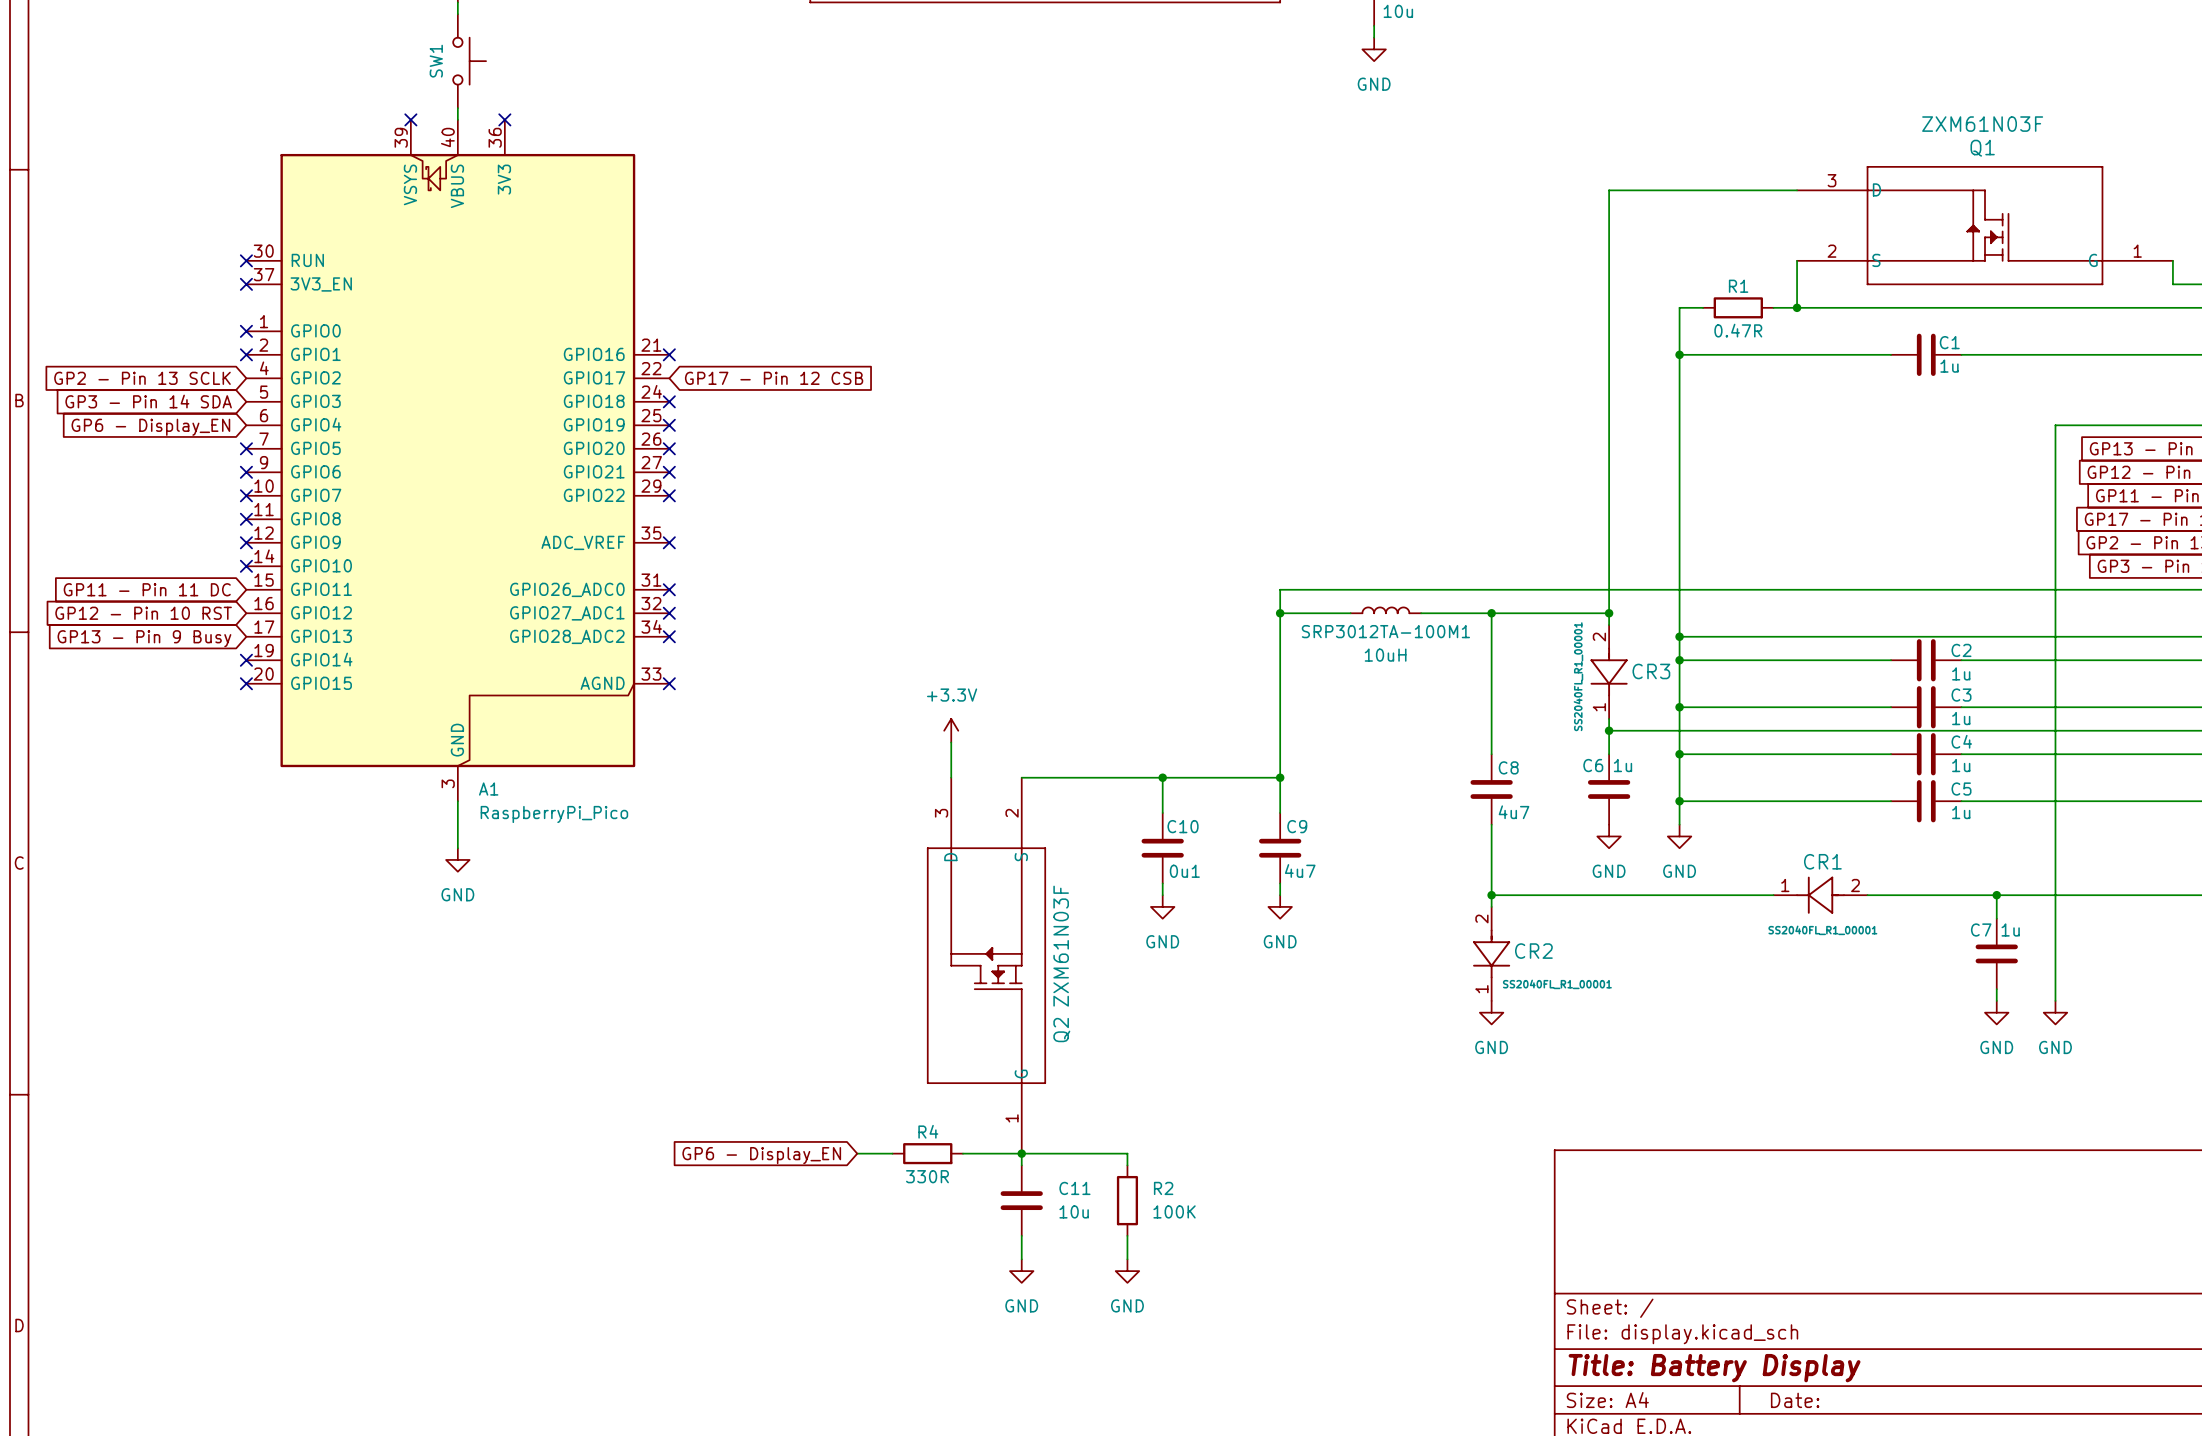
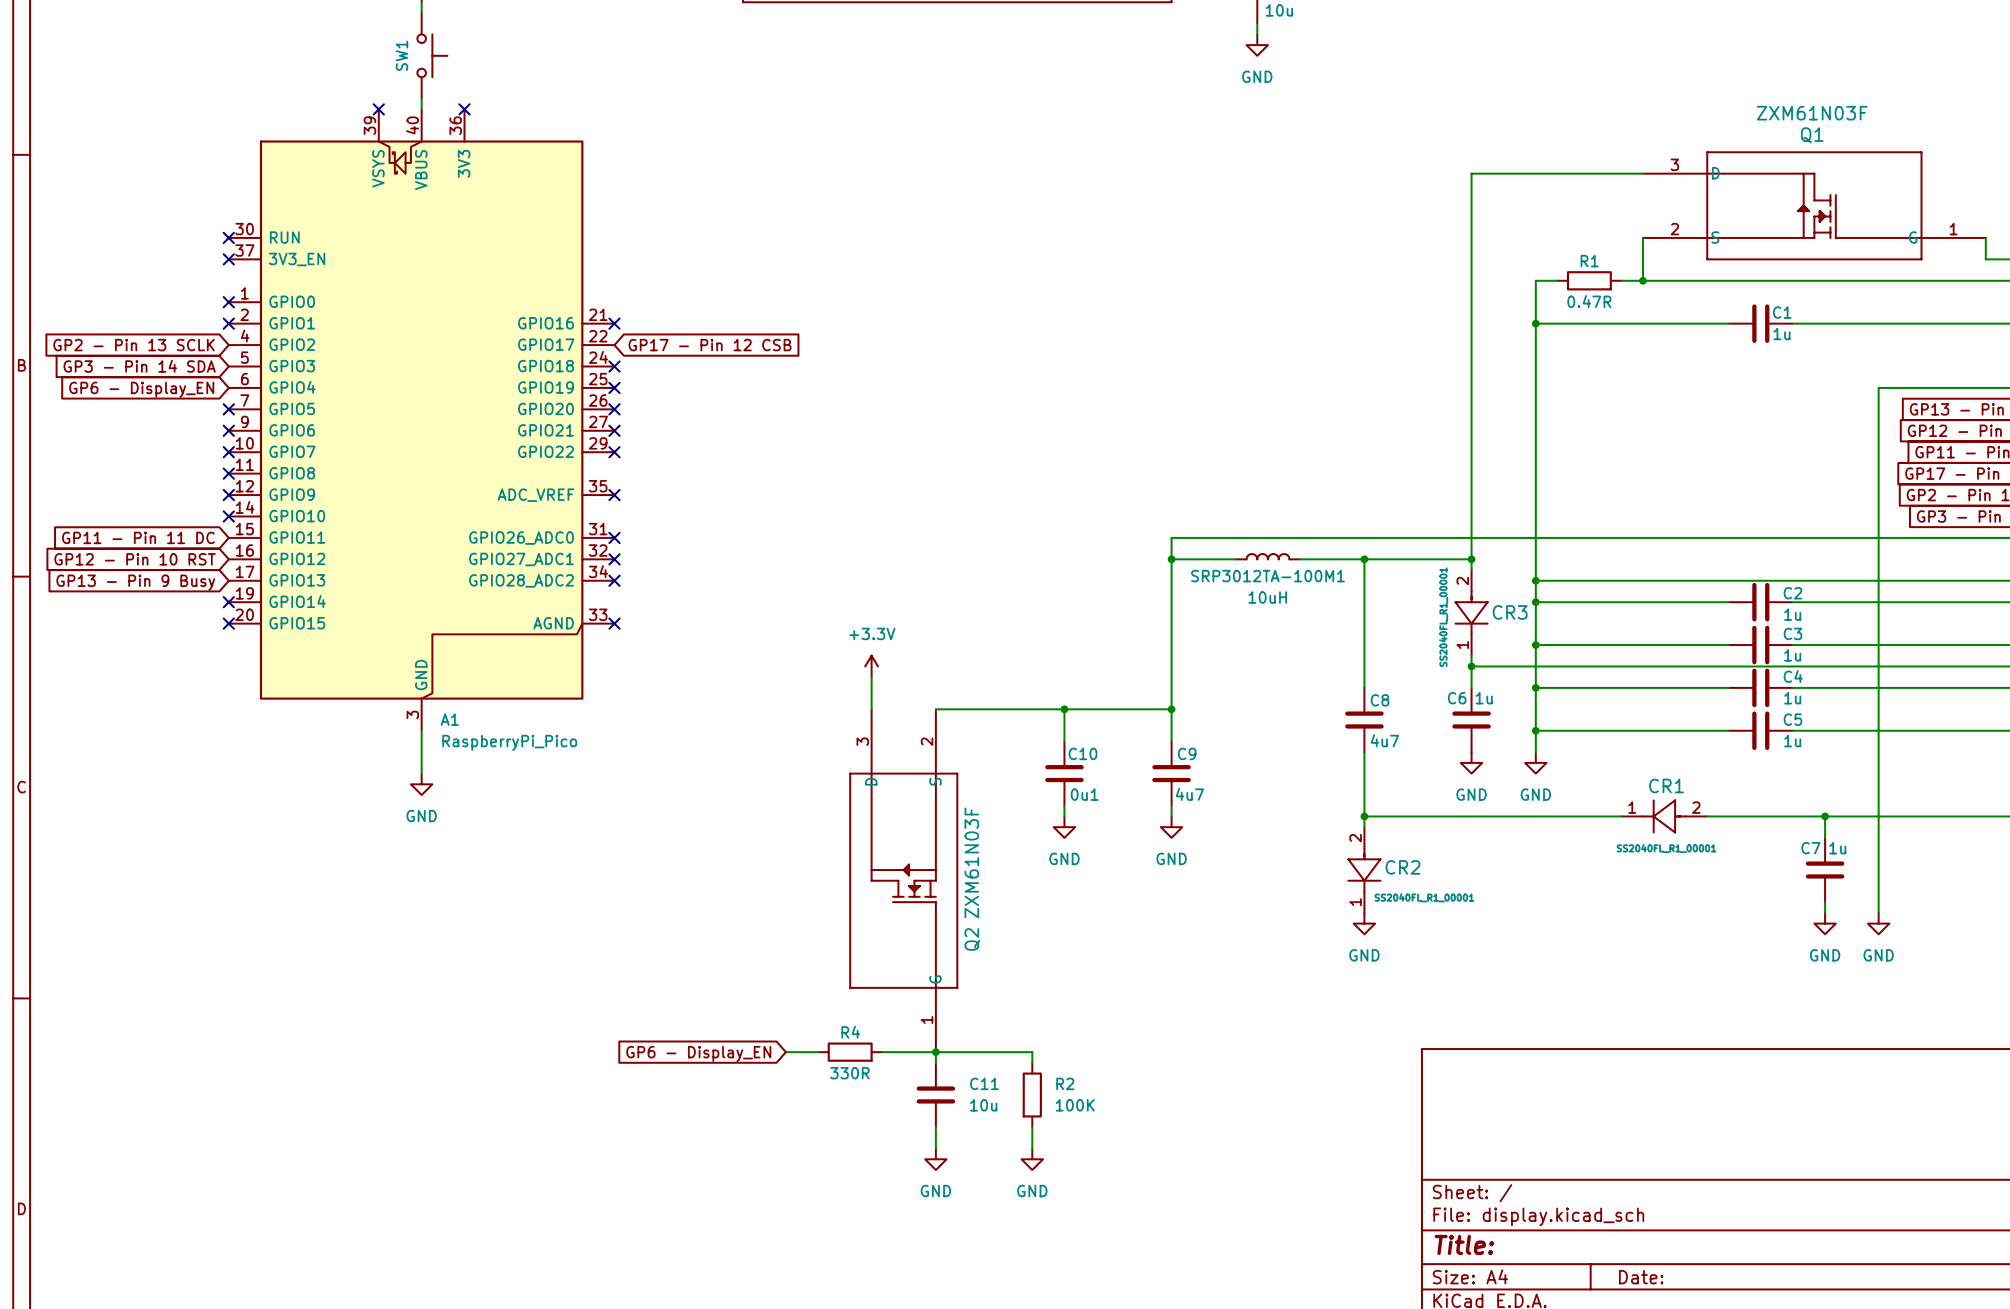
title block: Title: Battery Display (1714, 1368) -> Title: (1464, 1244)

